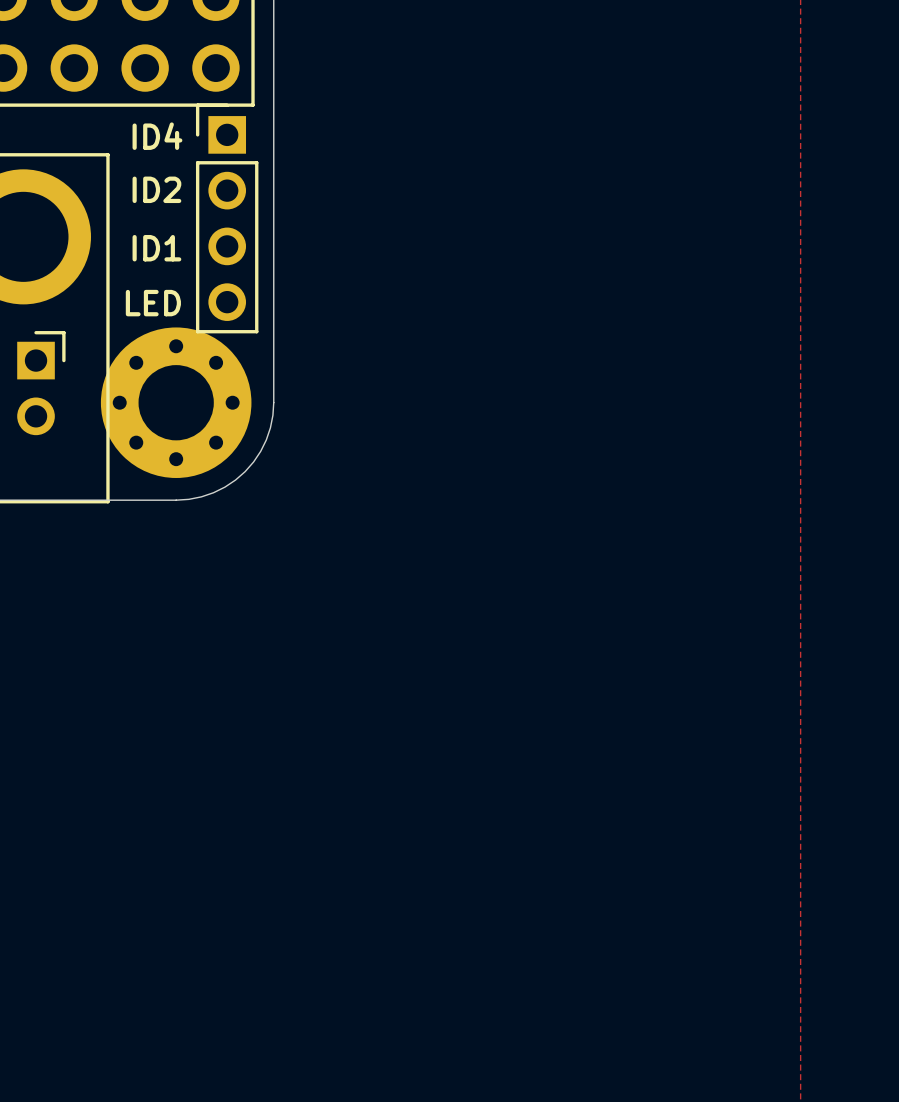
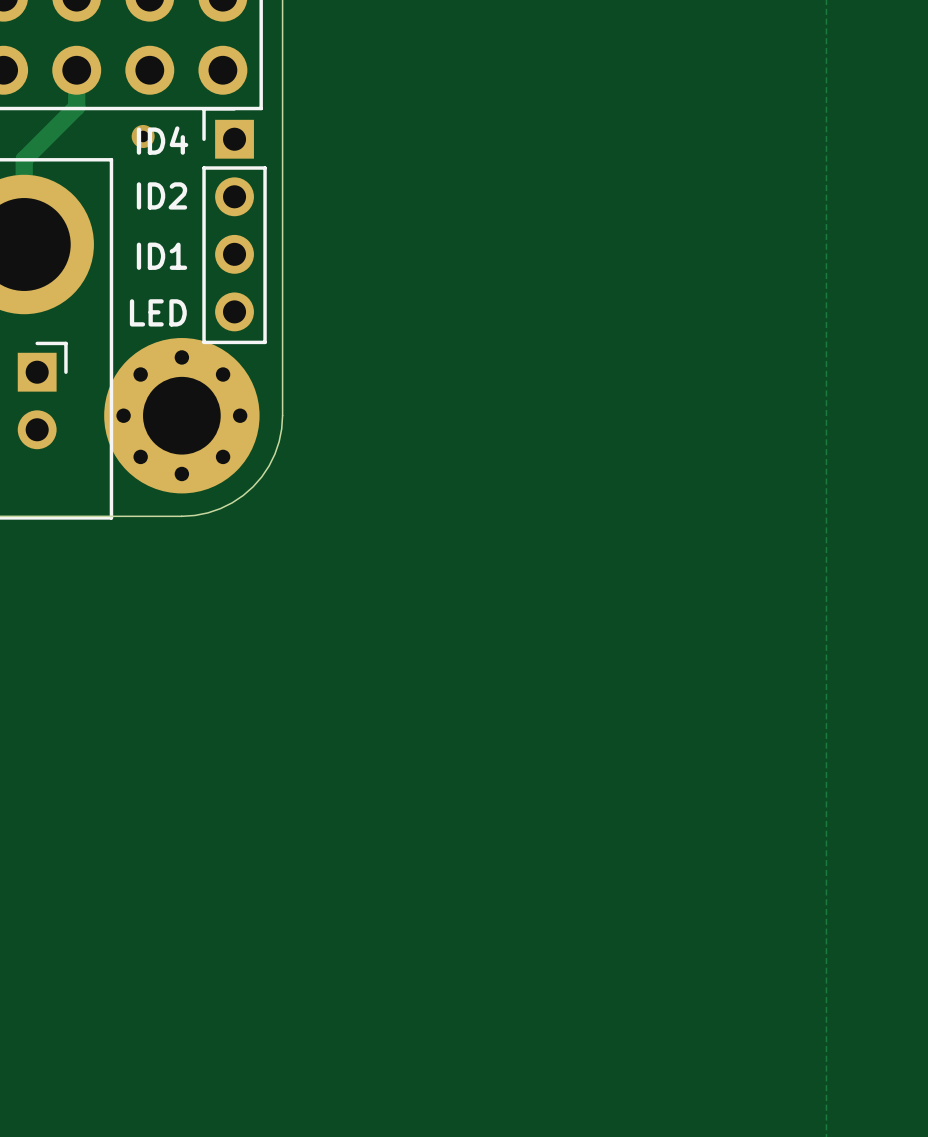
track: none -> (76, 70) (76, 107) (24, 159) (24, 244)
via: none -> (143, 136)

